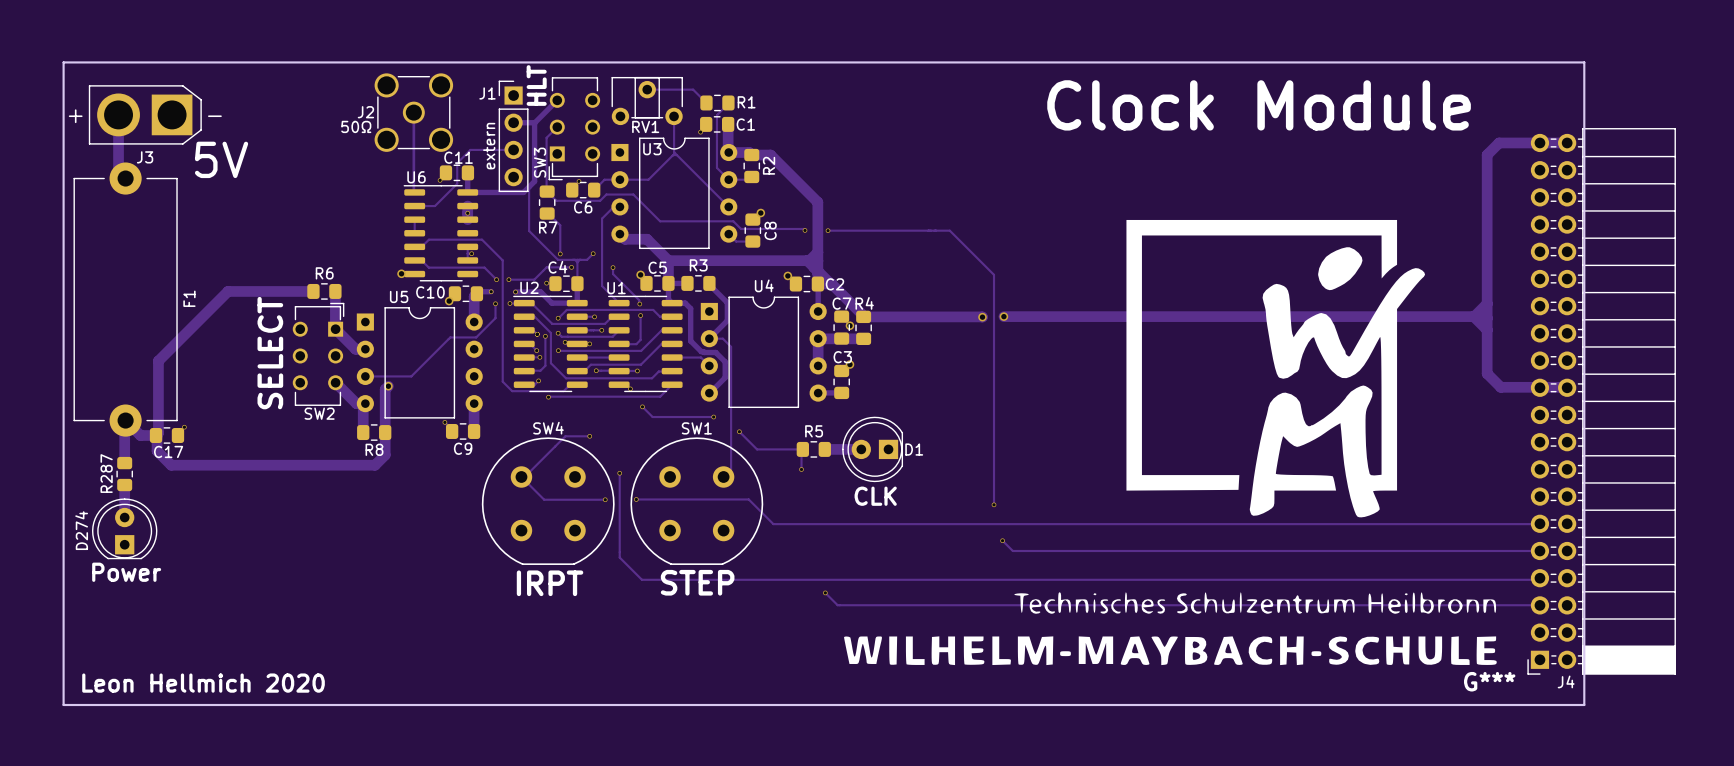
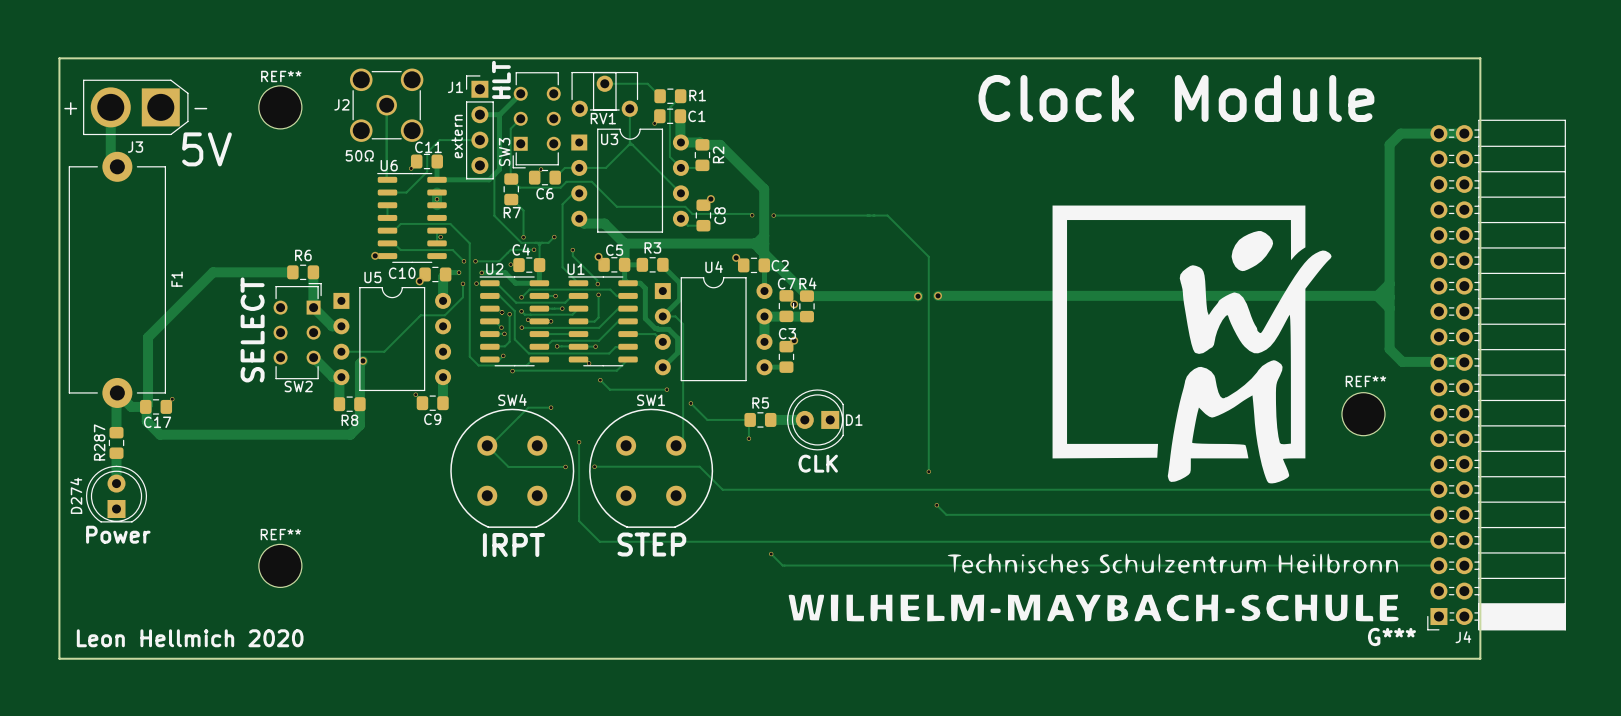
REF**: none -> (280, 107)
text position: 50Ω (356, 126) -> 50Ω (359, 155)
REF**: none -> (1363, 414)
REF**: none -> (280, 565)

